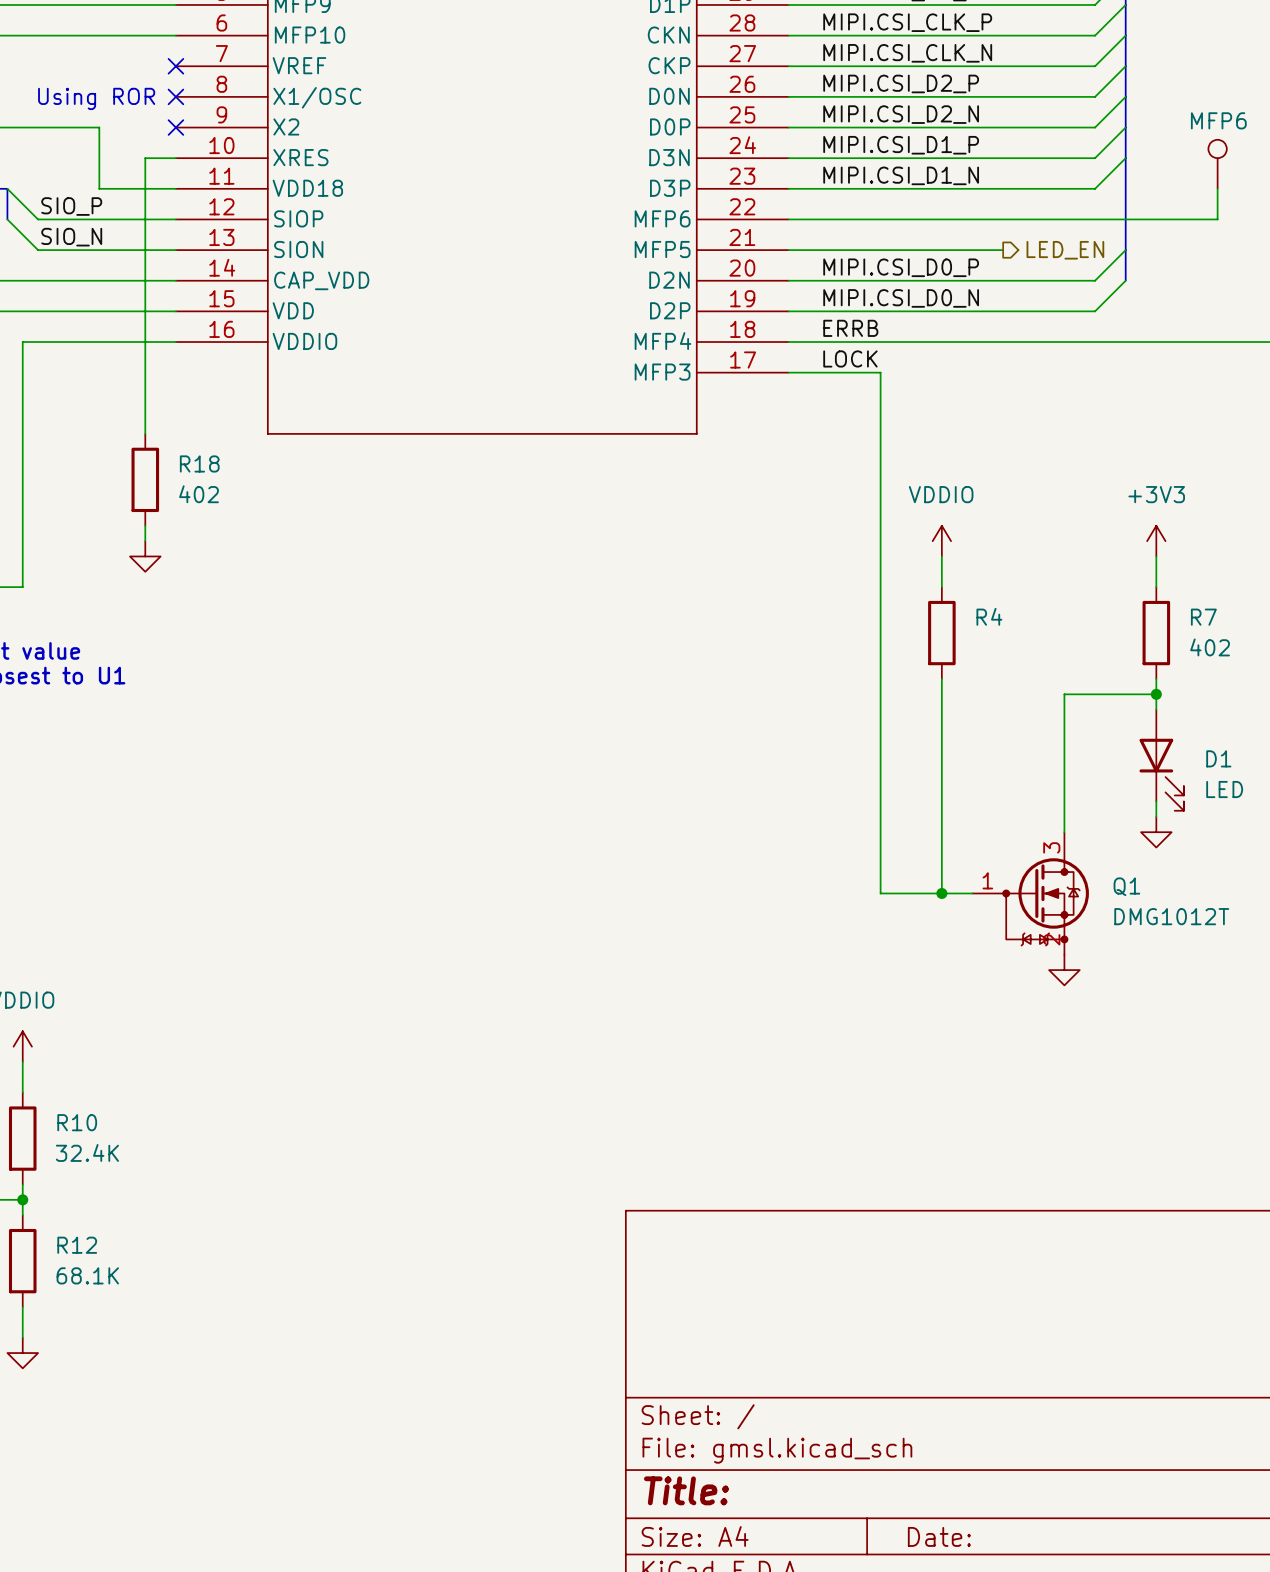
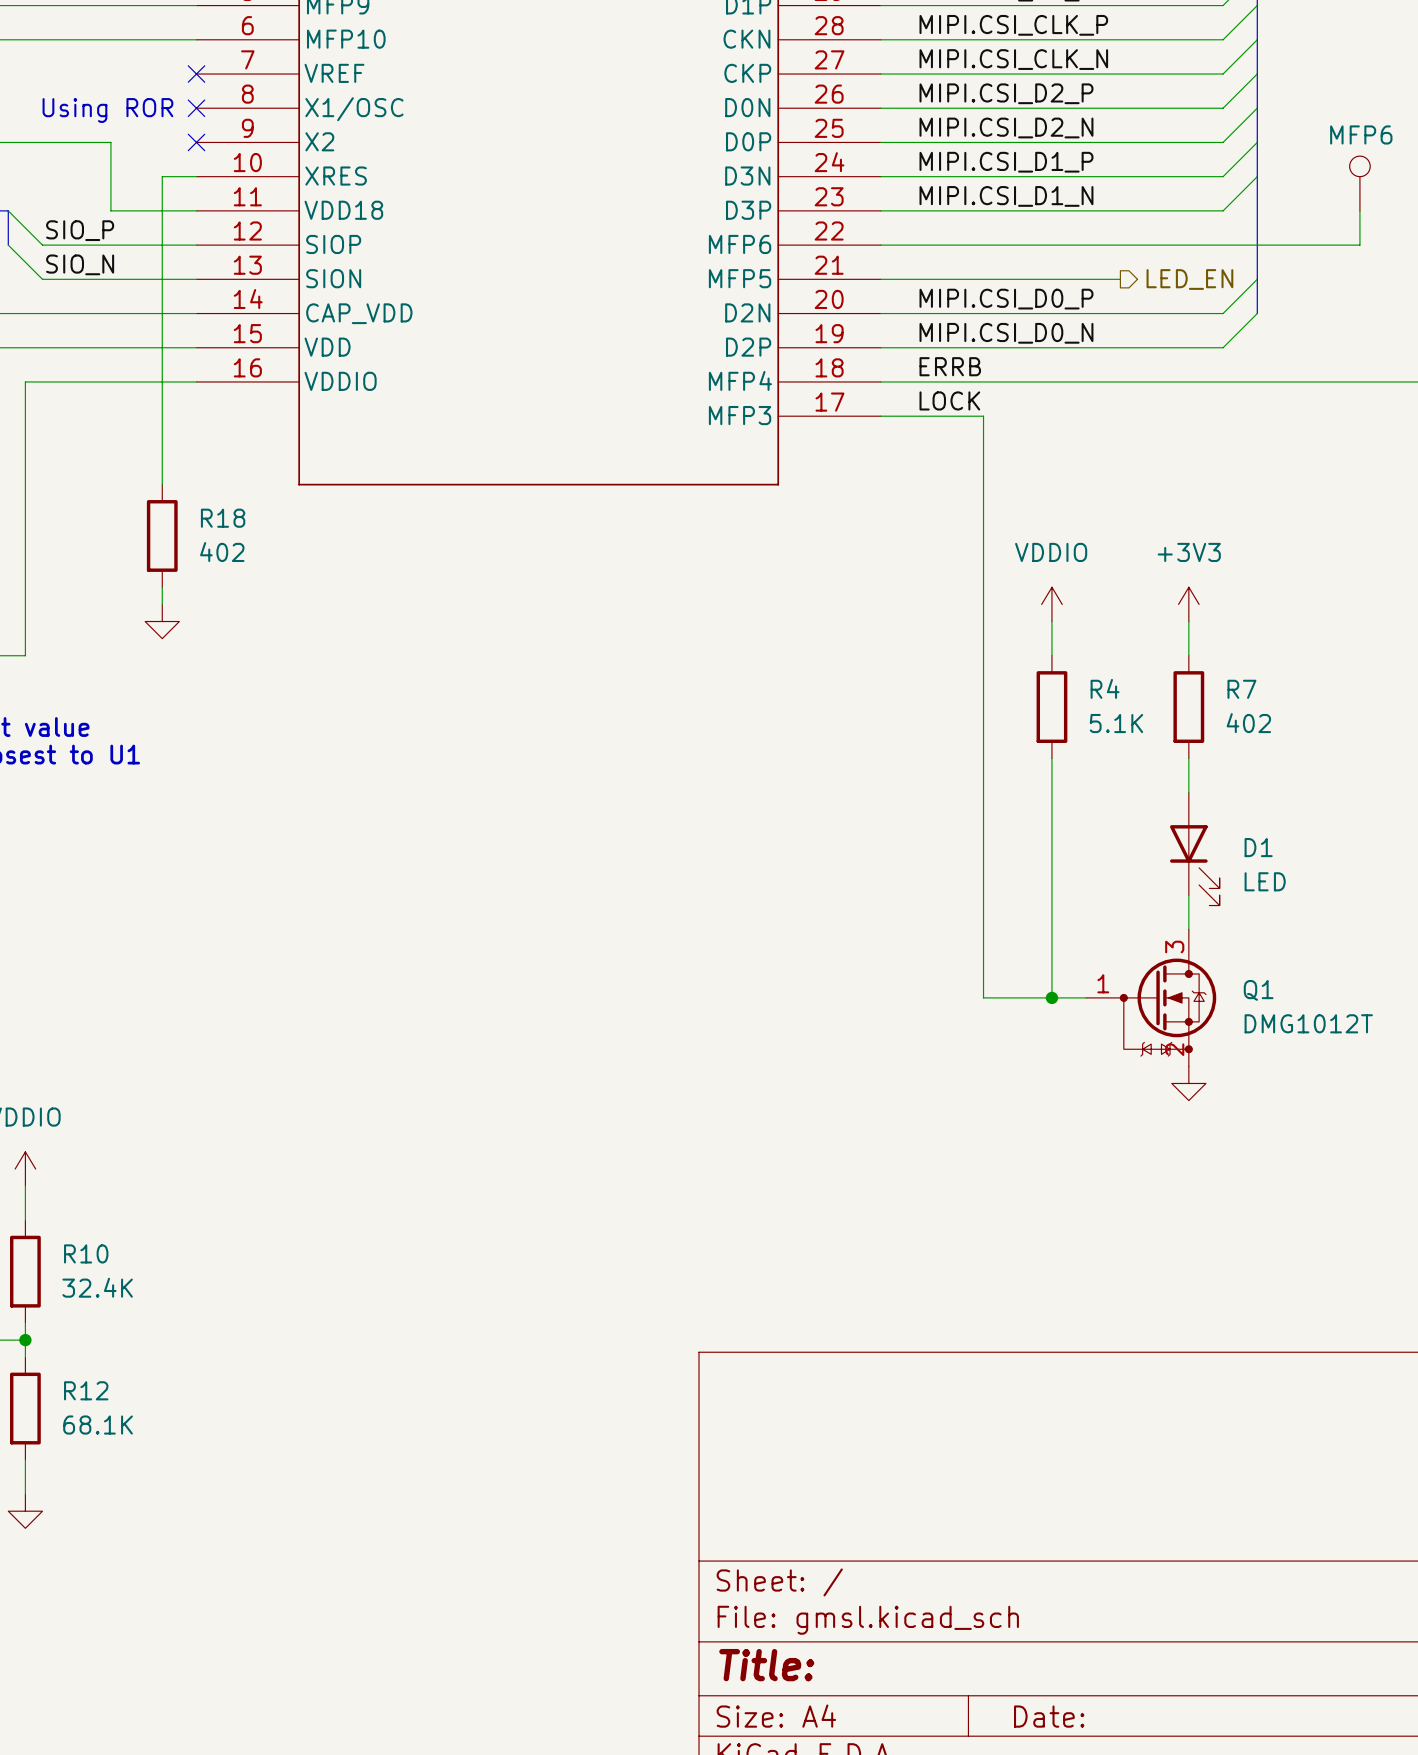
power symbol position: +3V3 (1156, 541) -> +3V3 (1188, 604)
wire: (1156, 556) (1156, 587) -> (1188, 621) (1188, 655)
R7 position: (1156, 633) -> (1188, 707)
R4 value: none -> 5.1K (1116, 723)
wire: (1156, 679) (1156, 709) -> none
wire: (1064, 694) (1156, 694) -> (1188, 775) (1188, 758)
junction: (1156, 694) -> none
D1 position: (1161, 760) -> (1194, 849)
wire: (1156, 801) (1156, 816) -> none
power symbol: (1156, 832) -> none

